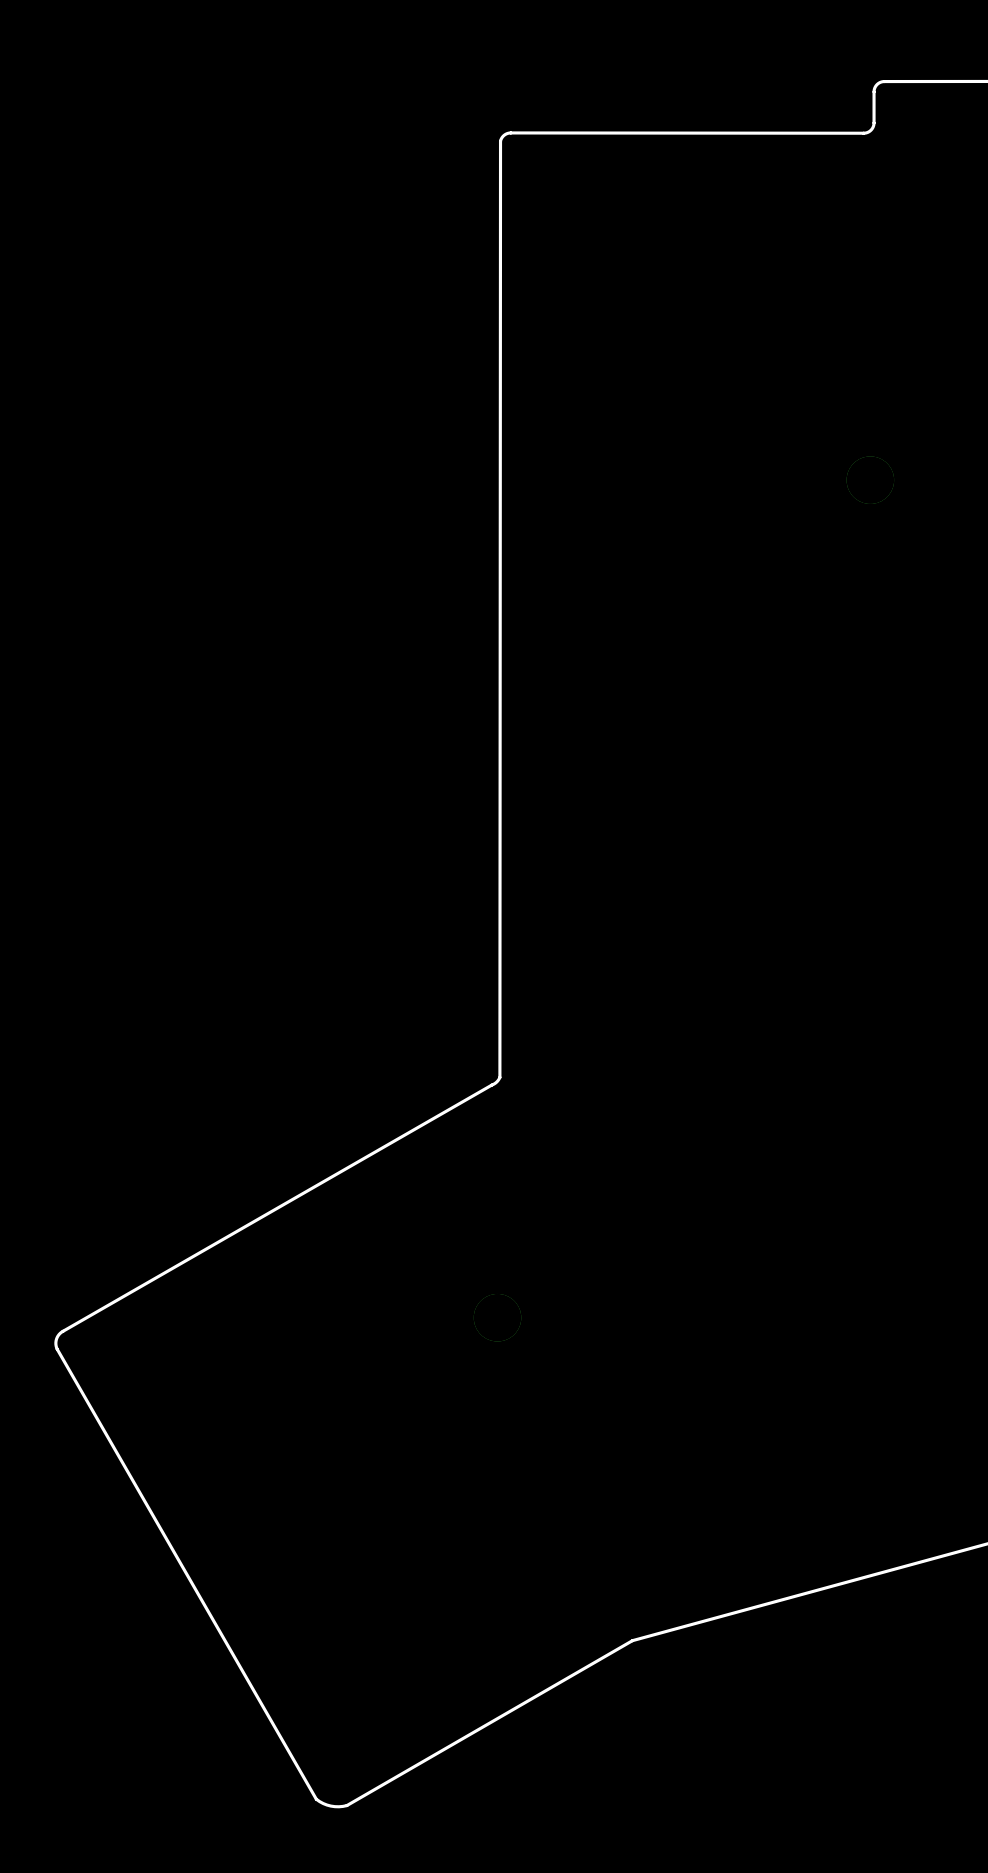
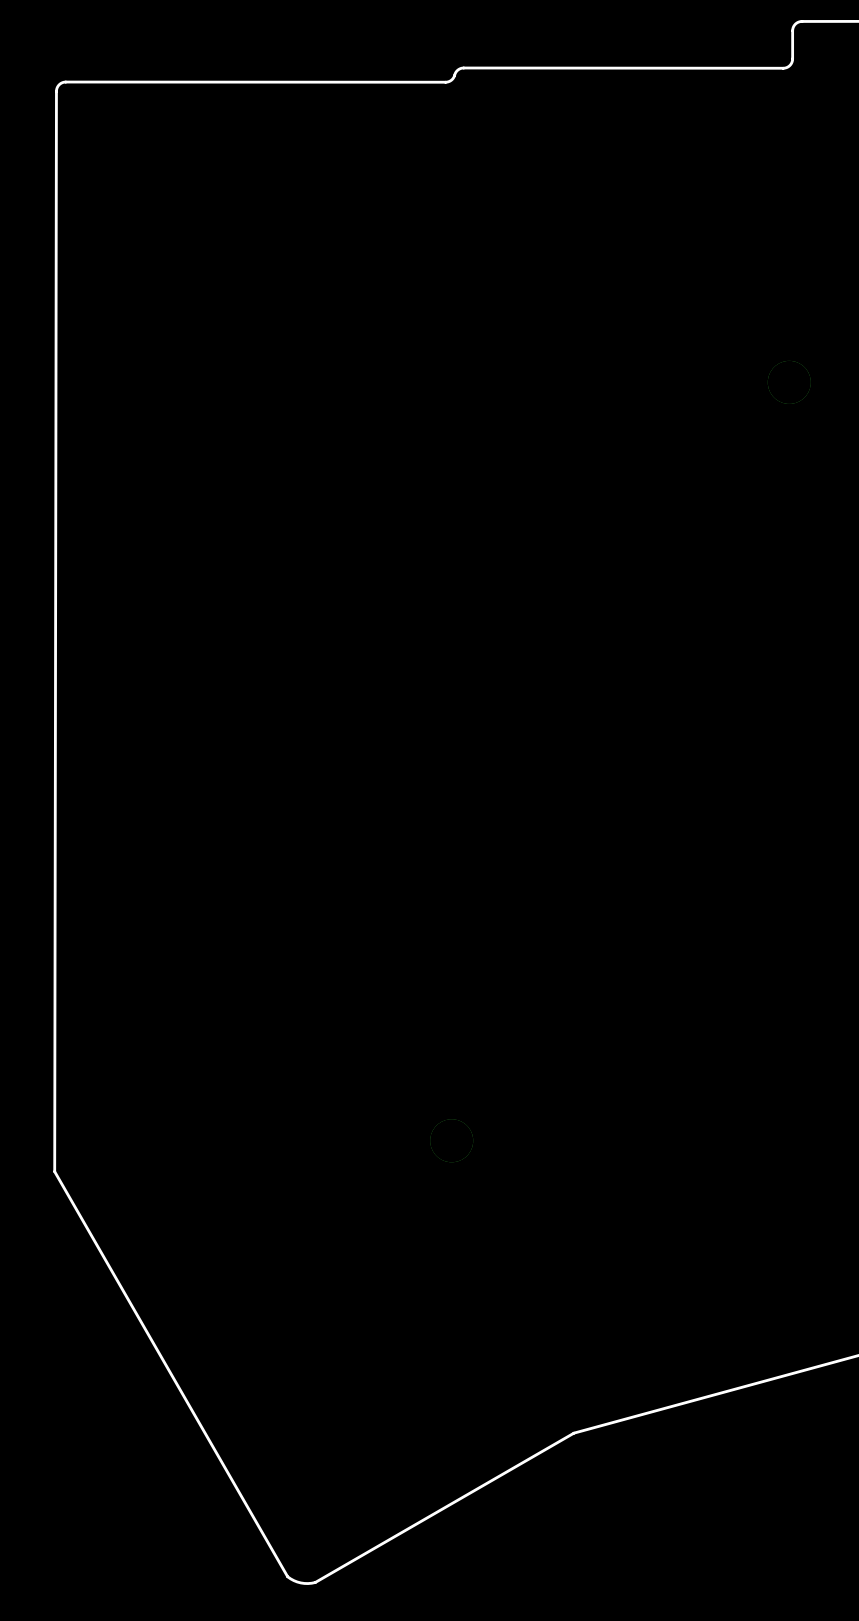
board edge: (510, 132) (504, 135) (500, 141) (499, 1077) (494, 1083) (63, 1331) (58, 1335) (55, 1342) (57, 1349) (316, 1799) -> (463, 68) (457, 70) (452, 79) (445, 82) (65, 82) (60, 83) (56, 90) (54, 1171) (287, 1576)

